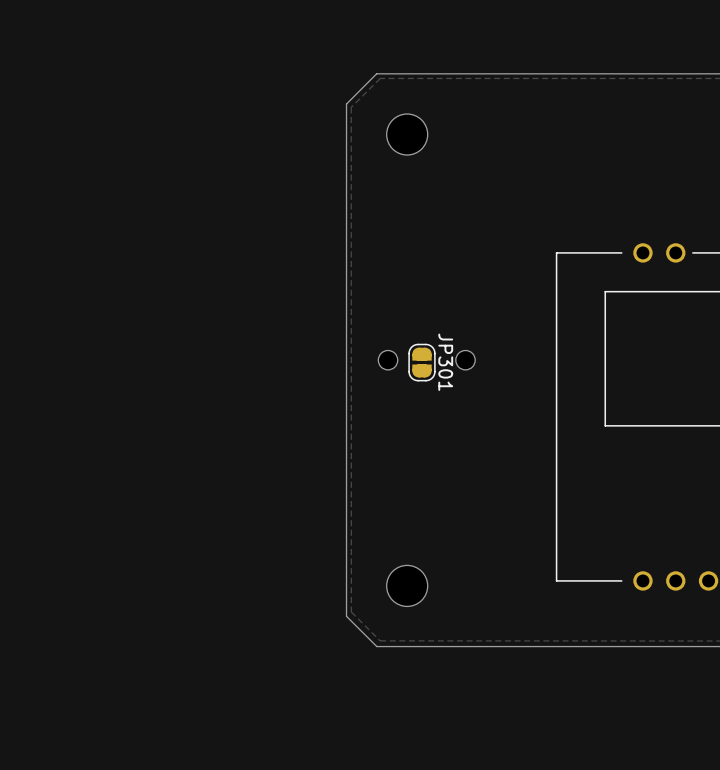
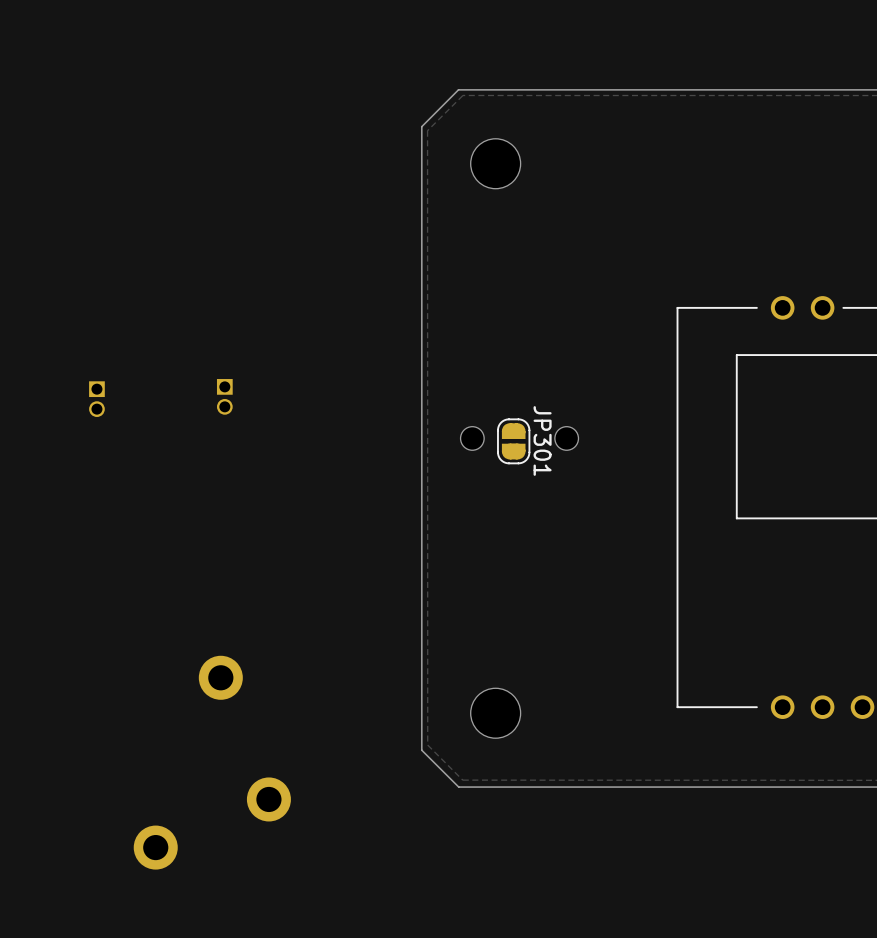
part: none -> (224, 396)
part: none -> (96, 399)
part: none -> (220, 677)
part: none -> (268, 799)
part: none -> (155, 847)

